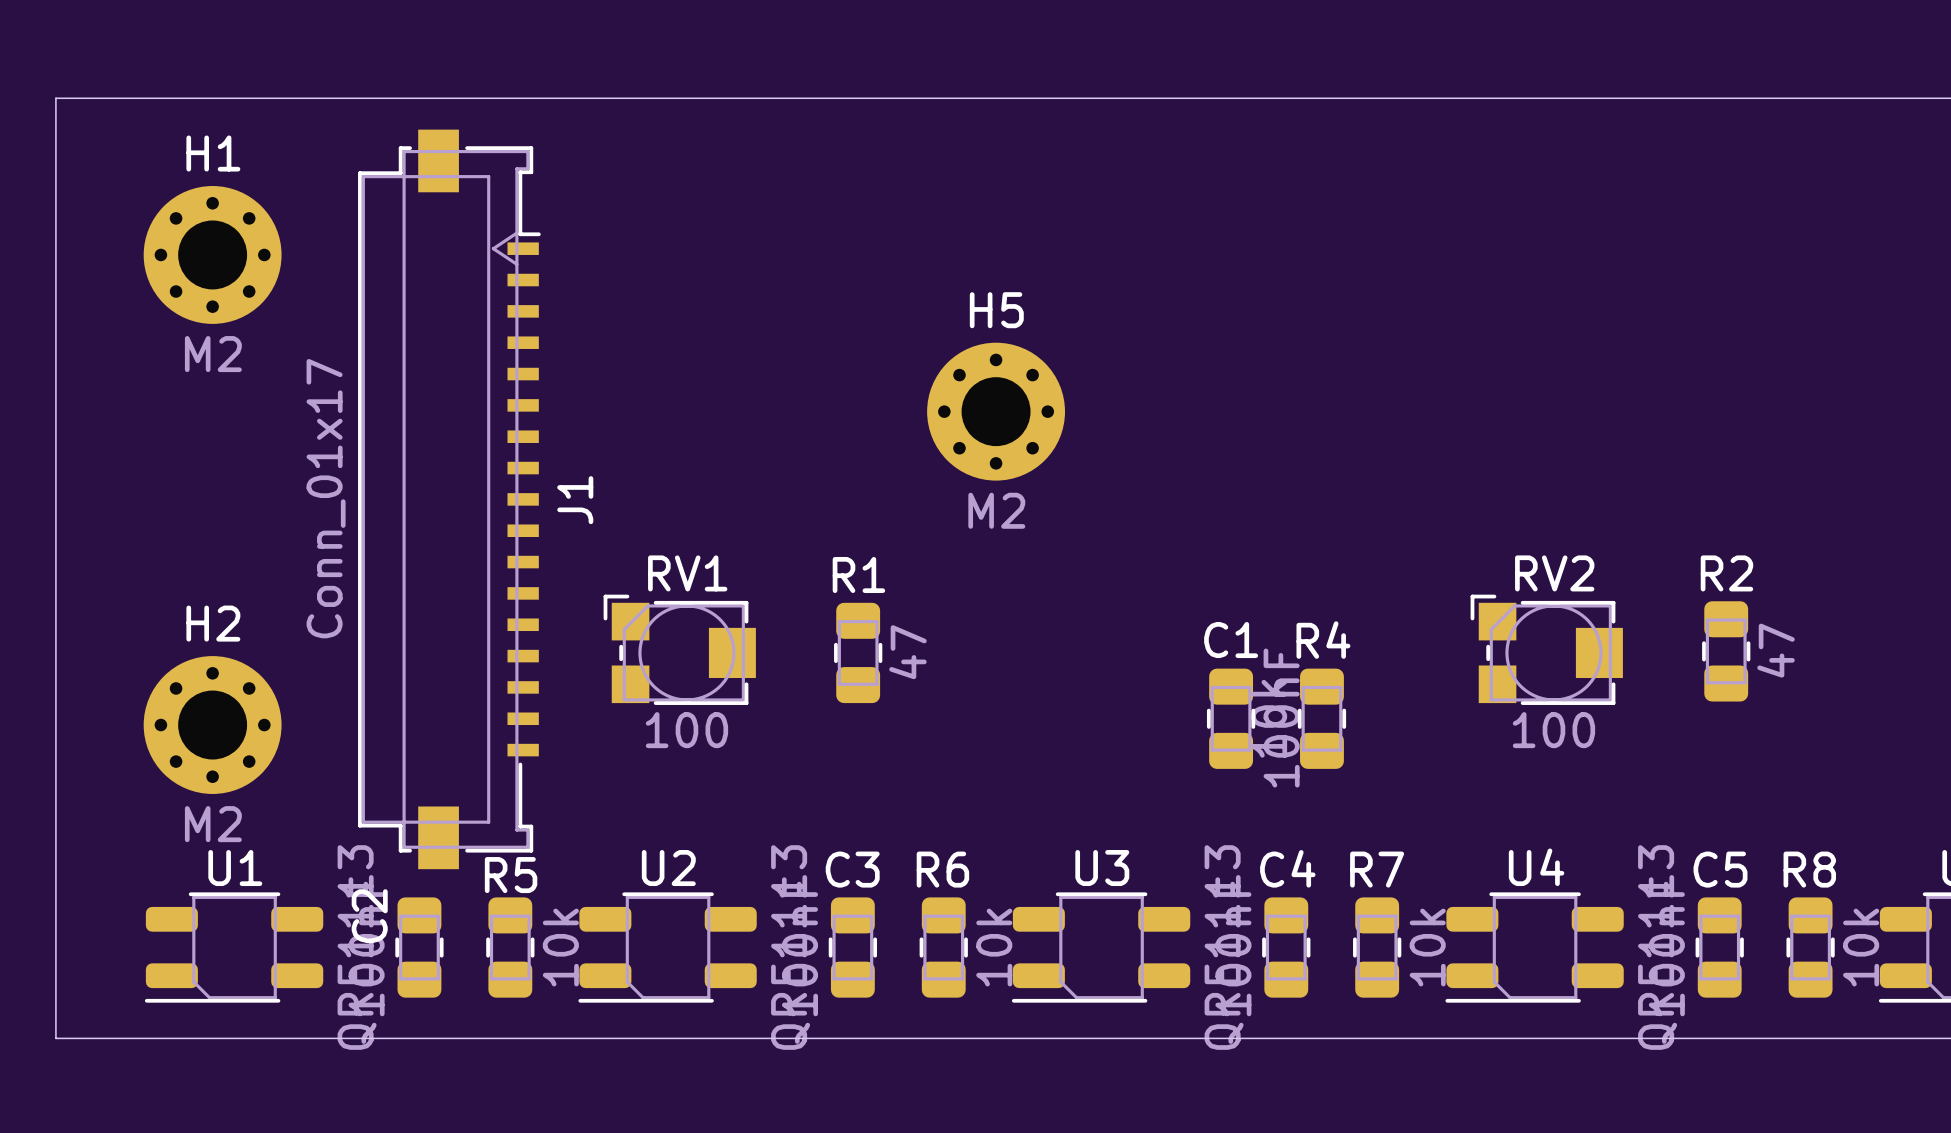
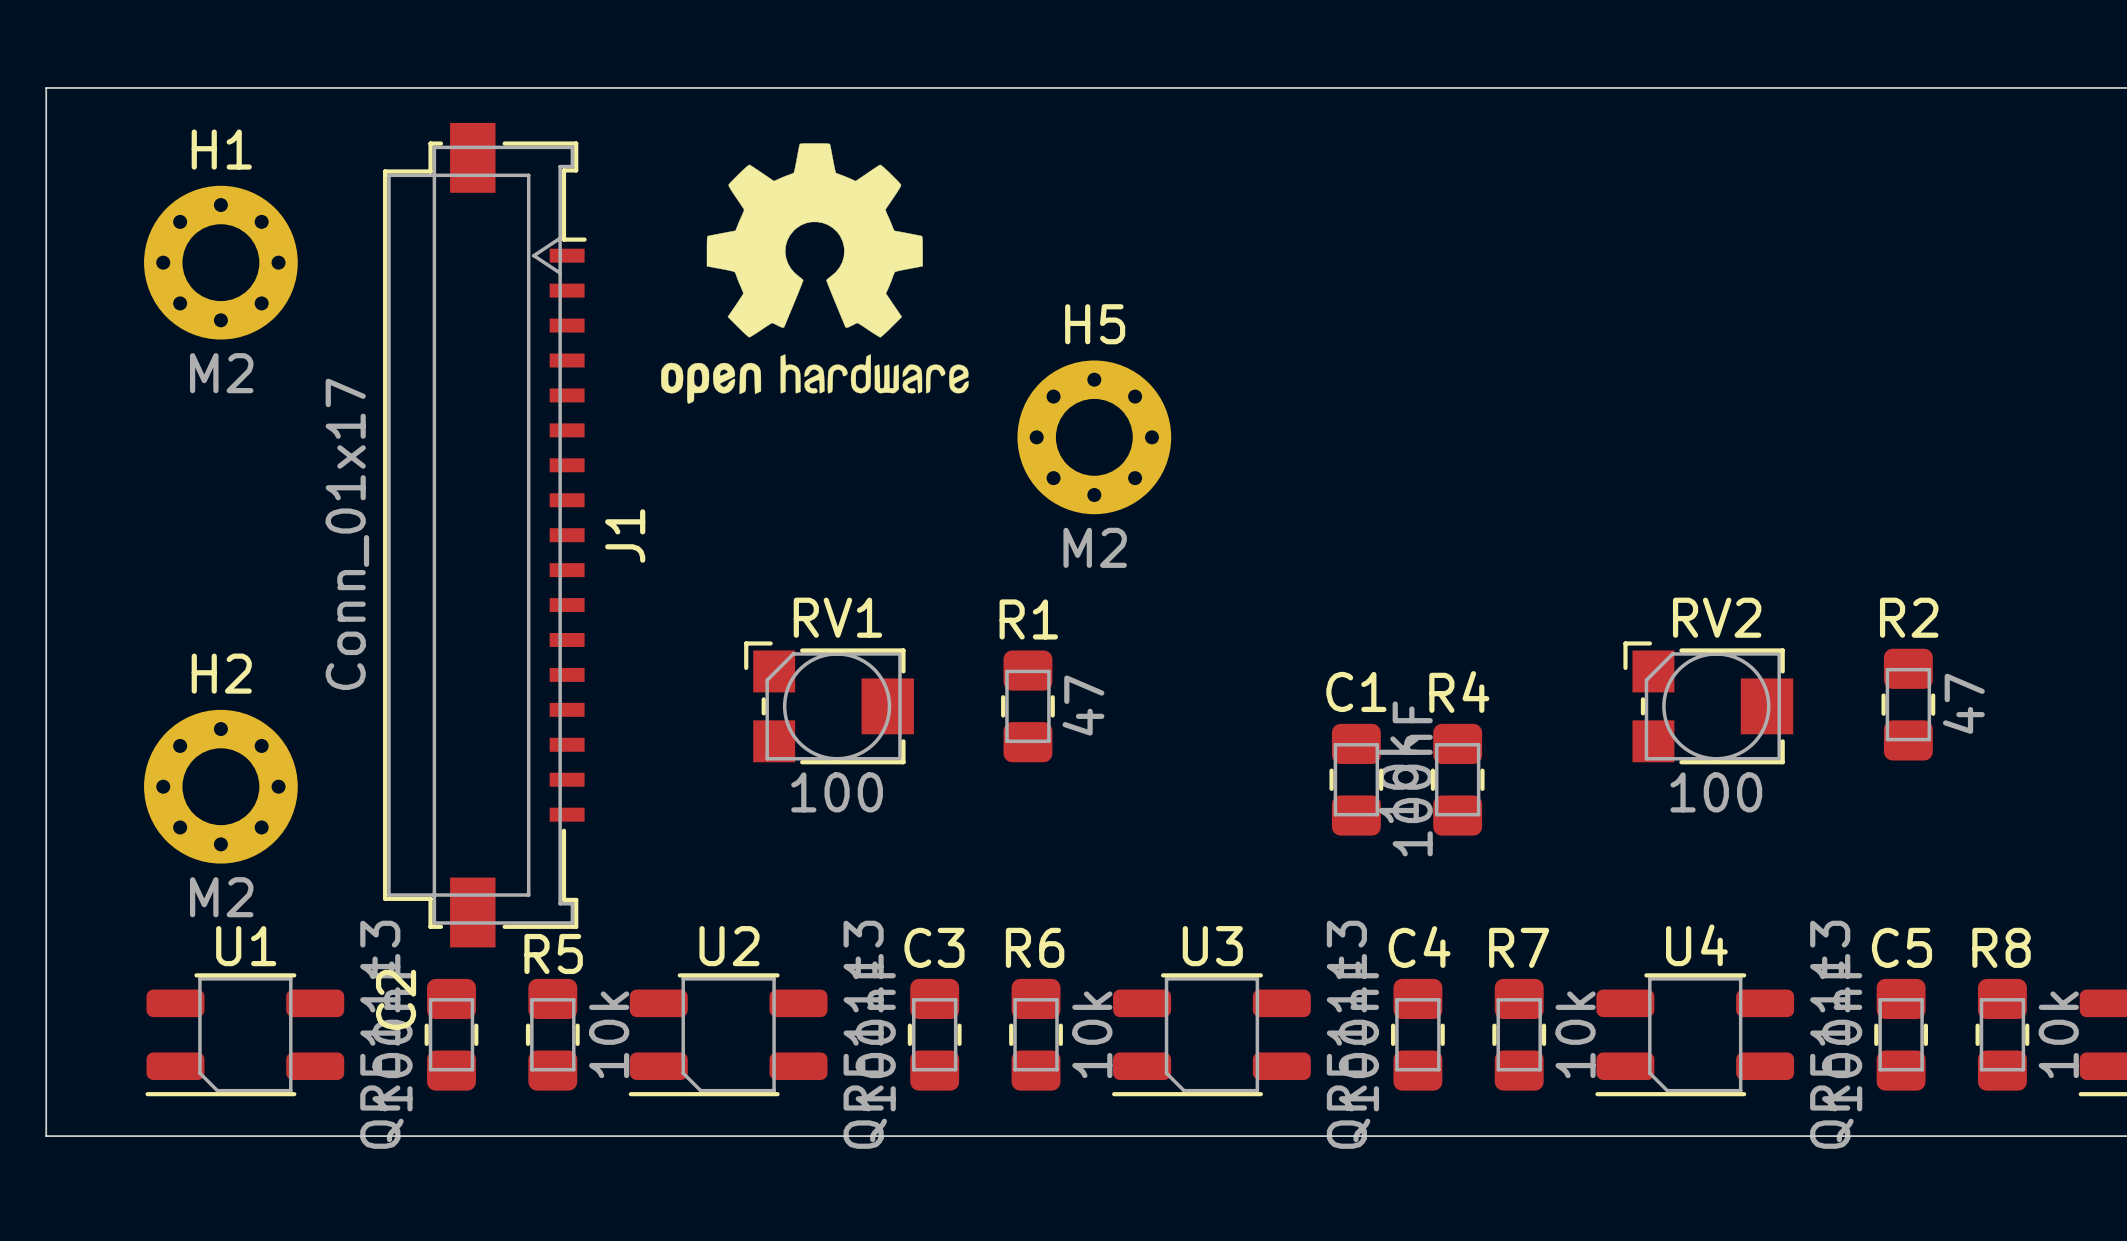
drawing: none -> [661, 143, 969, 404]
RV1 position: (679, 649) -> (829, 702)
R1 position: (858, 652) -> (1027, 706)

